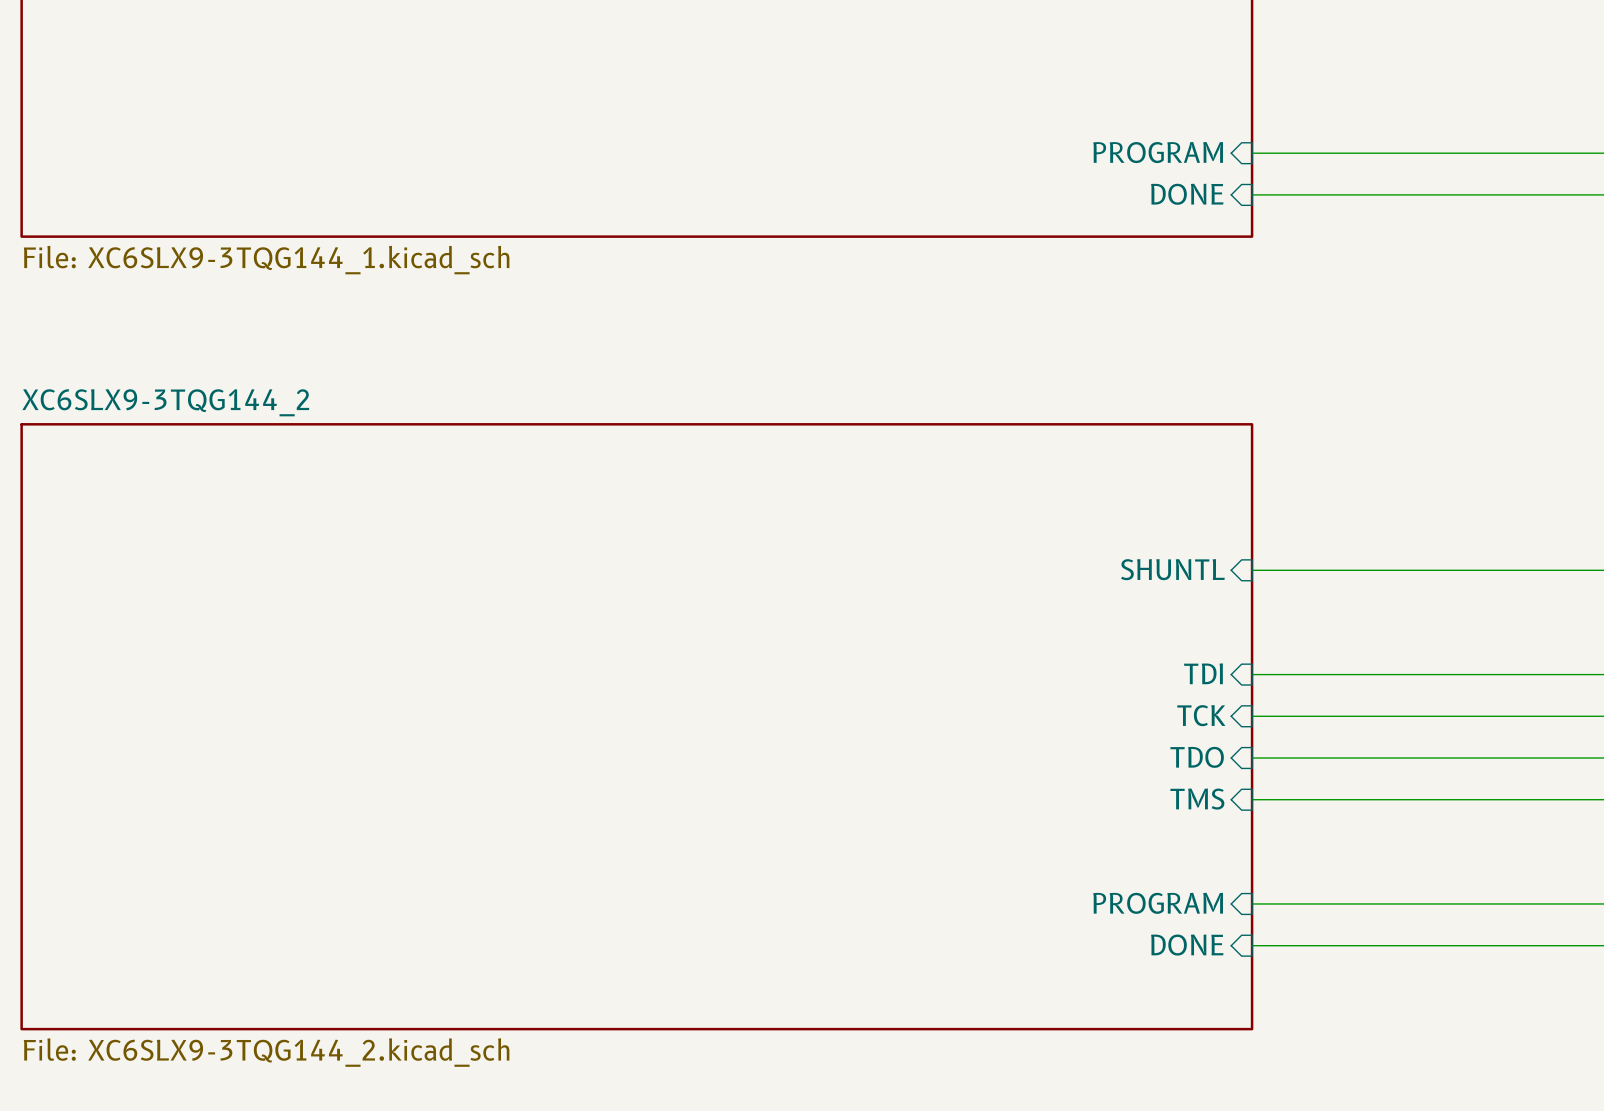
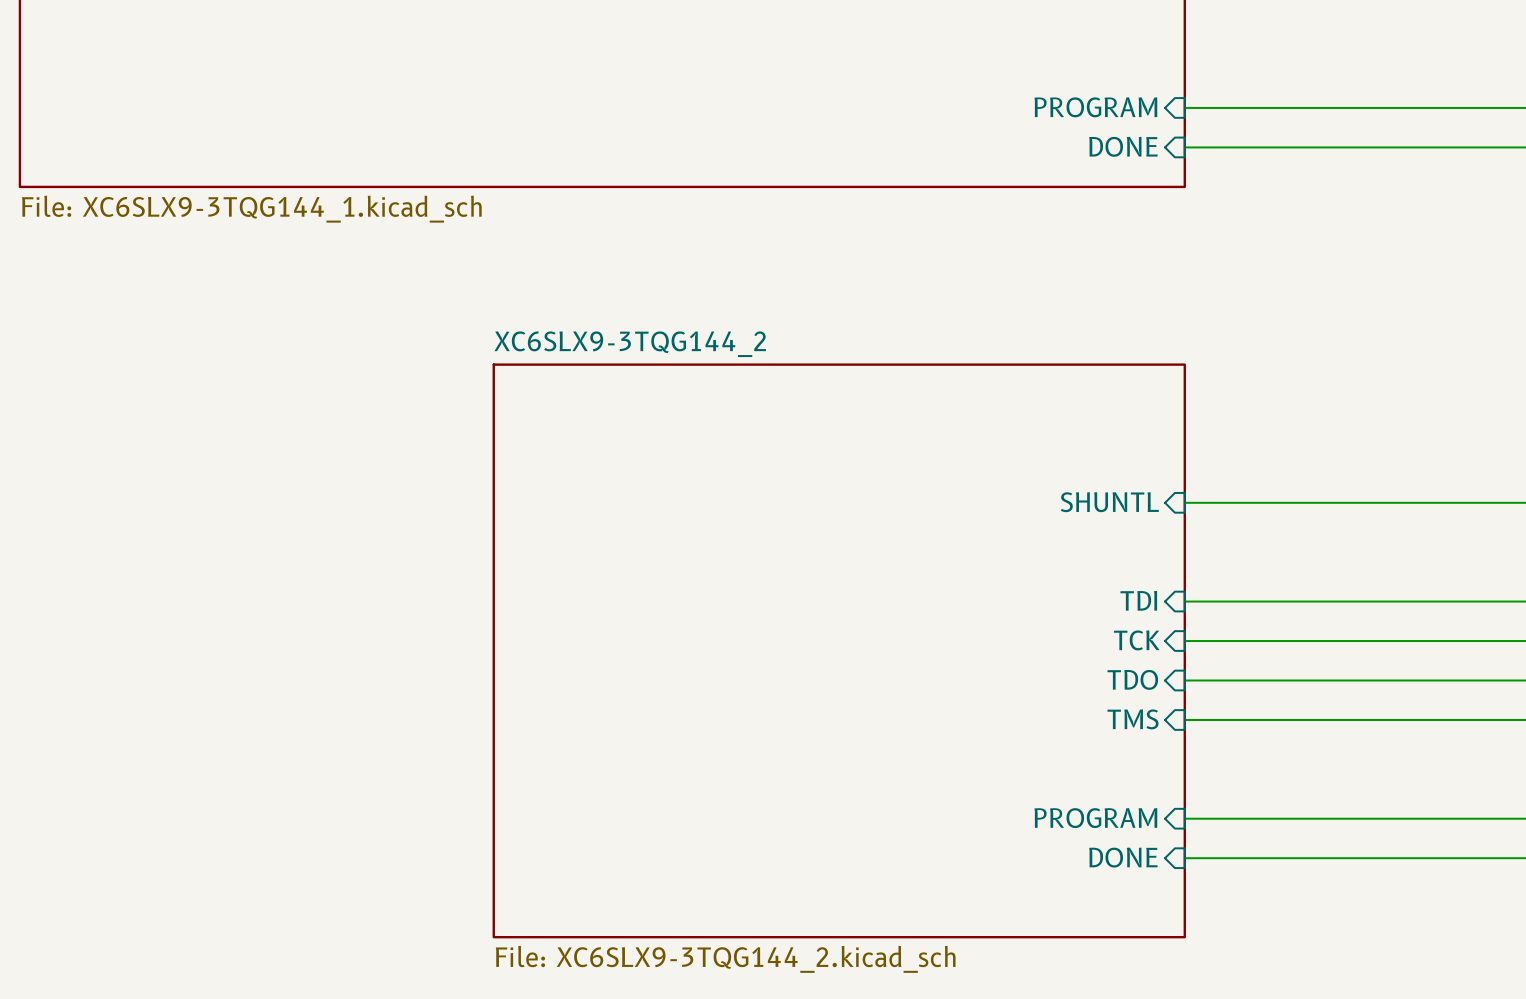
sheet XC6SLX9-3TQG144_2 name position: XC6SLX9-3TQG144_2 (165, 402) -> XC6SLX9-3TQG144_2 (630, 344)
sheet XC6SLX9-3TQG144_2 shape: [20, 423, 1254, 1031] -> [492, 363, 1186, 939]
sheet XC6SLX9-3TQG144_2 value position: File: XC6SLX9-3TQG144_2.kicad_sch (266, 1052) -> File: XC6SLX9-3TQG144_2.kicad_sch (725, 959)

